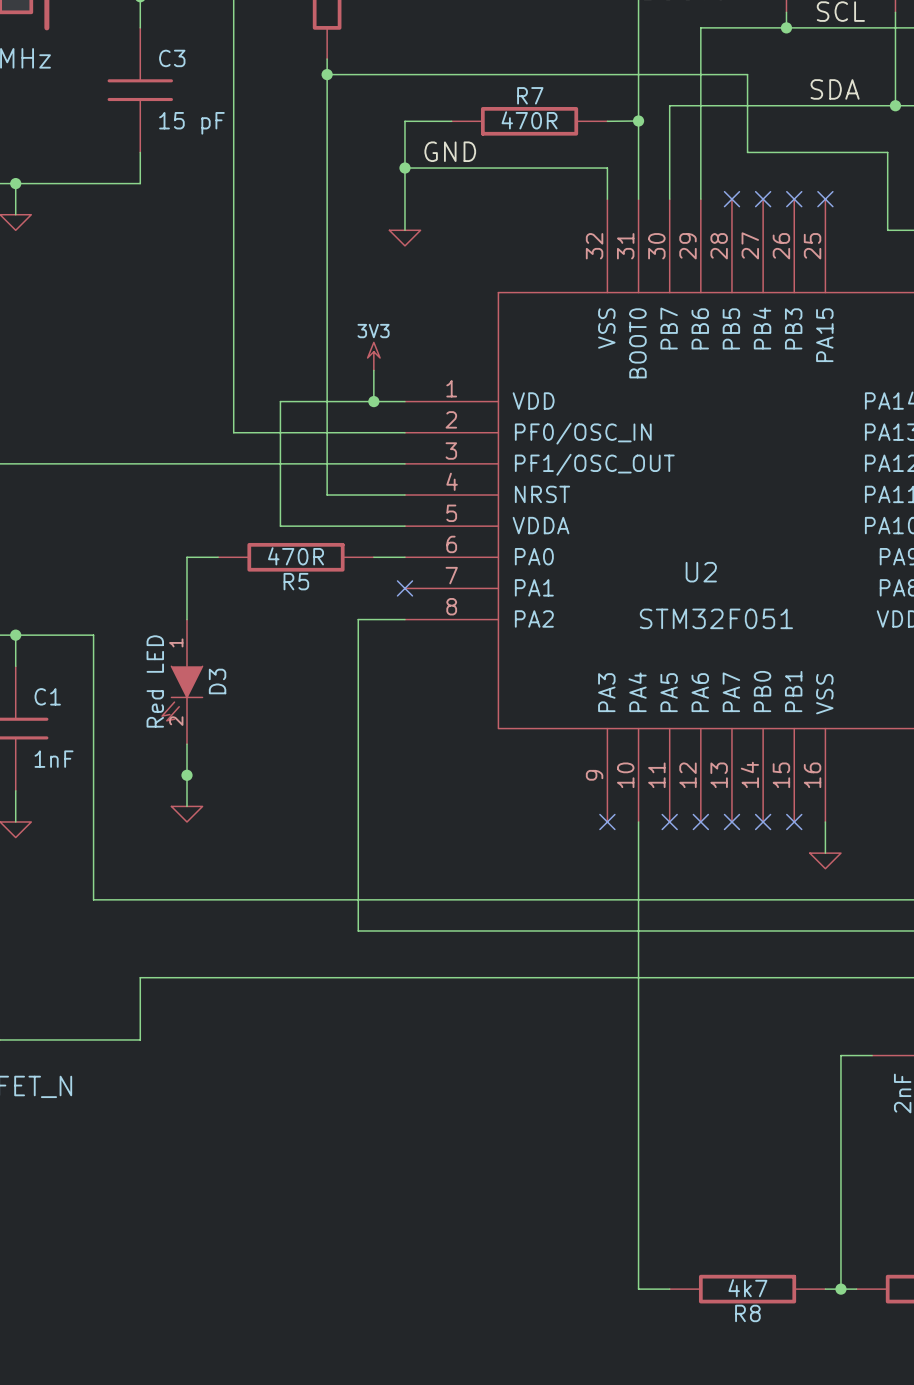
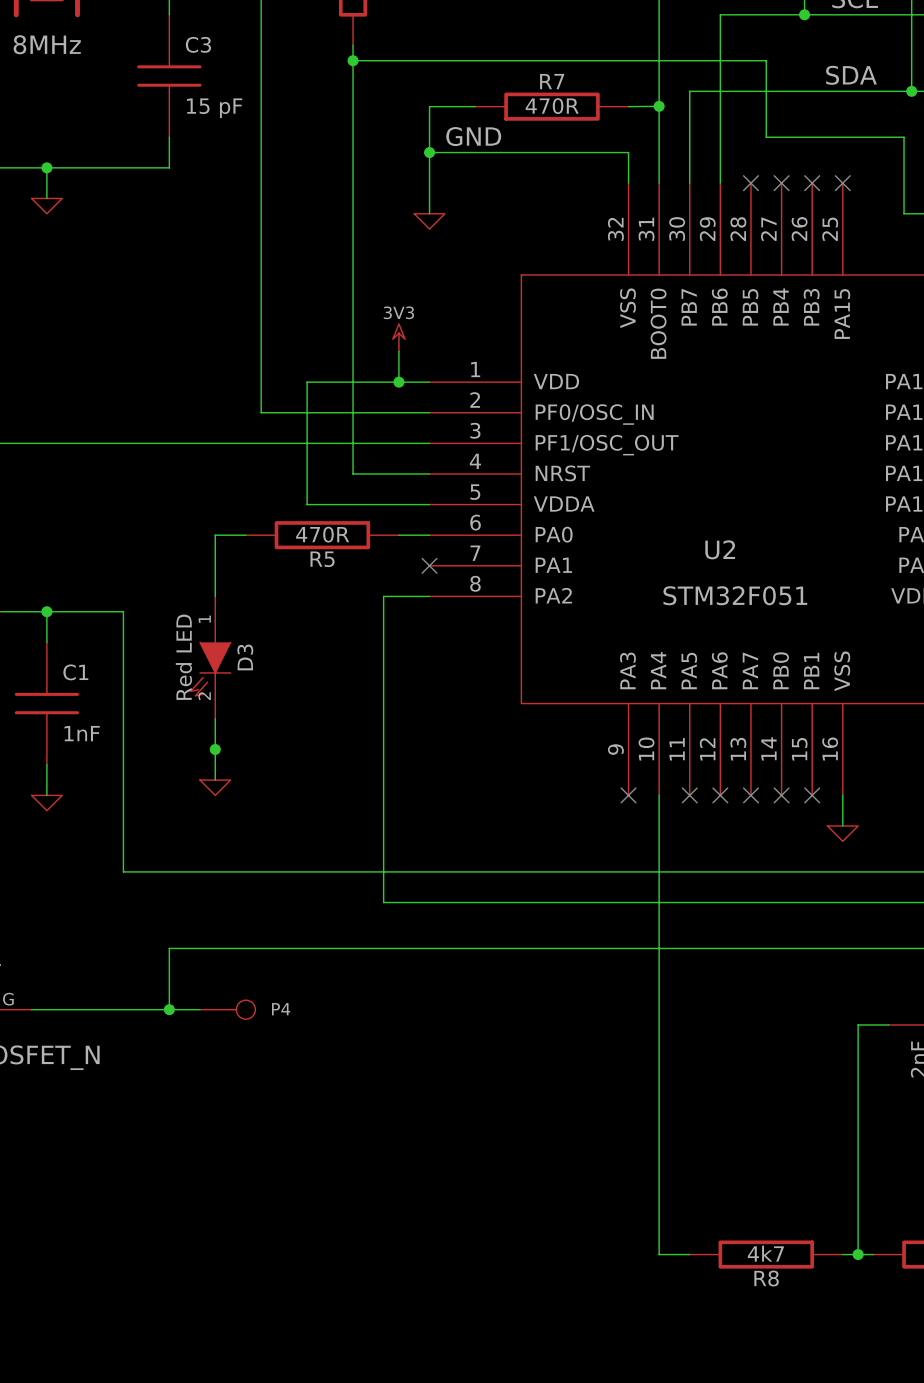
wire: none -> (169, 1009) (199, 1009)
junction: none -> (169, 1009)
P4: none -> (227, 1009)

